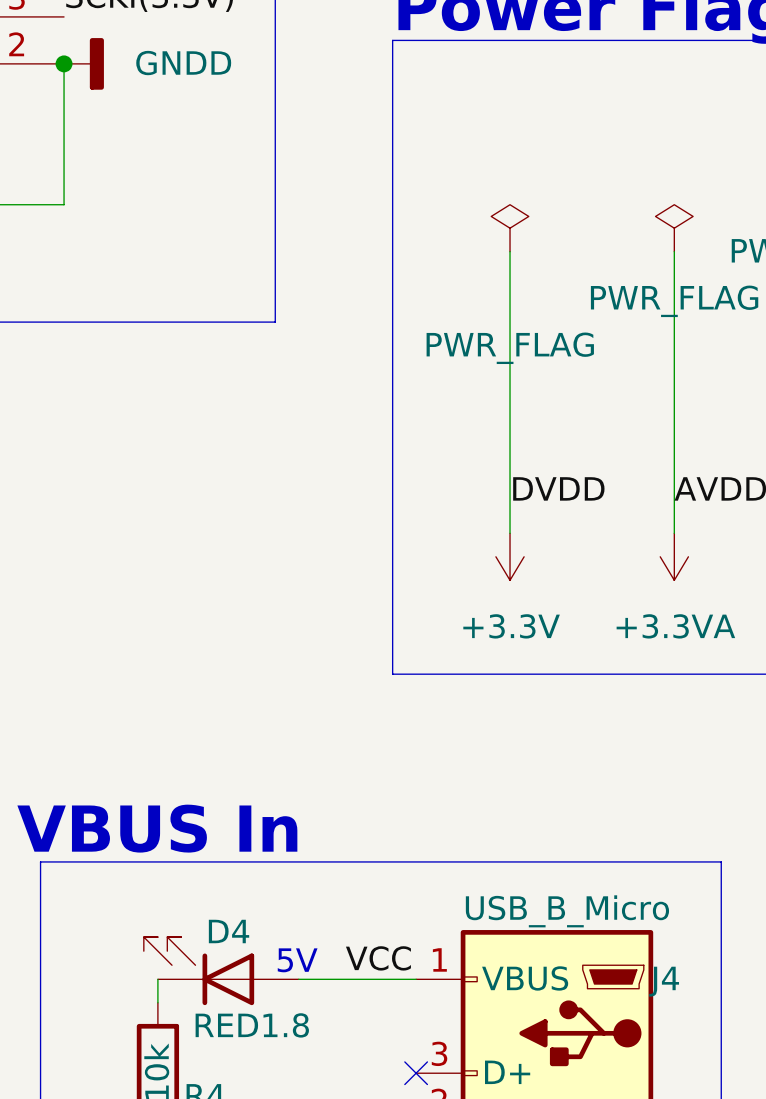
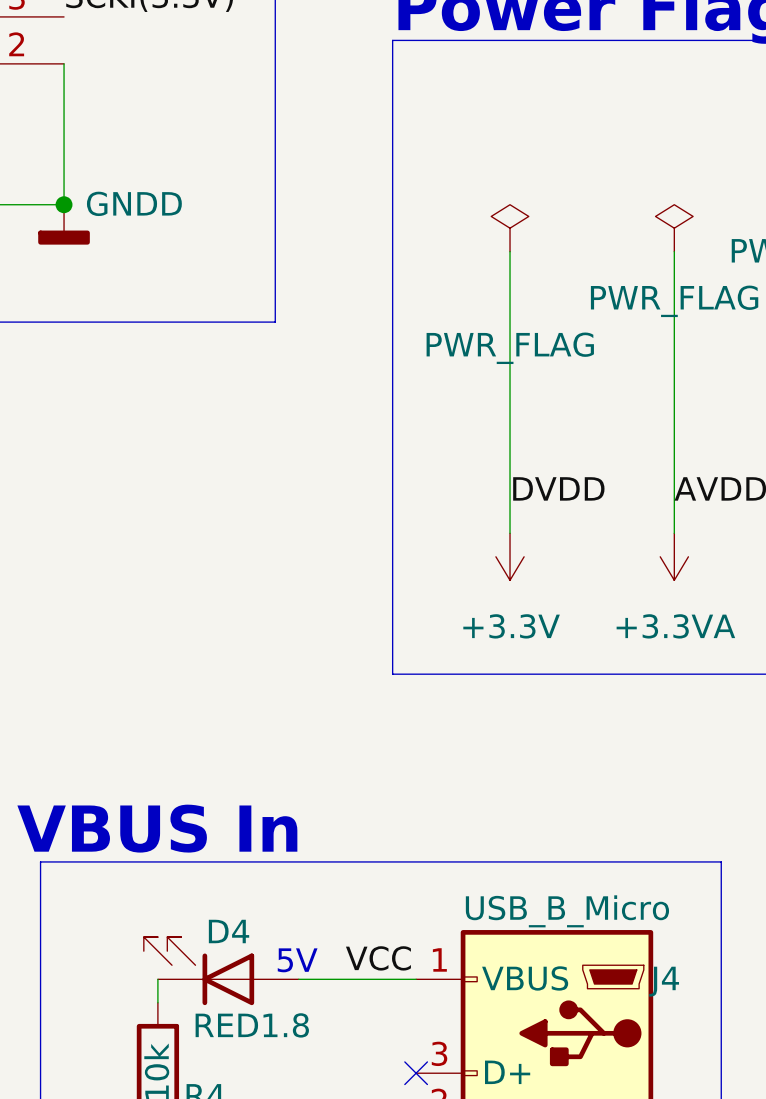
junction: (64, 63) -> none
power symbol rotation: 0° (83, 63) -> 90° clockwise (64, 224)
power symbol position: GNDD (83, 63) -> GNDD (64, 224)
power symbol text position: GNDD (183, 63) -> GNDD (134, 203)
junction: none -> (64, 204)

